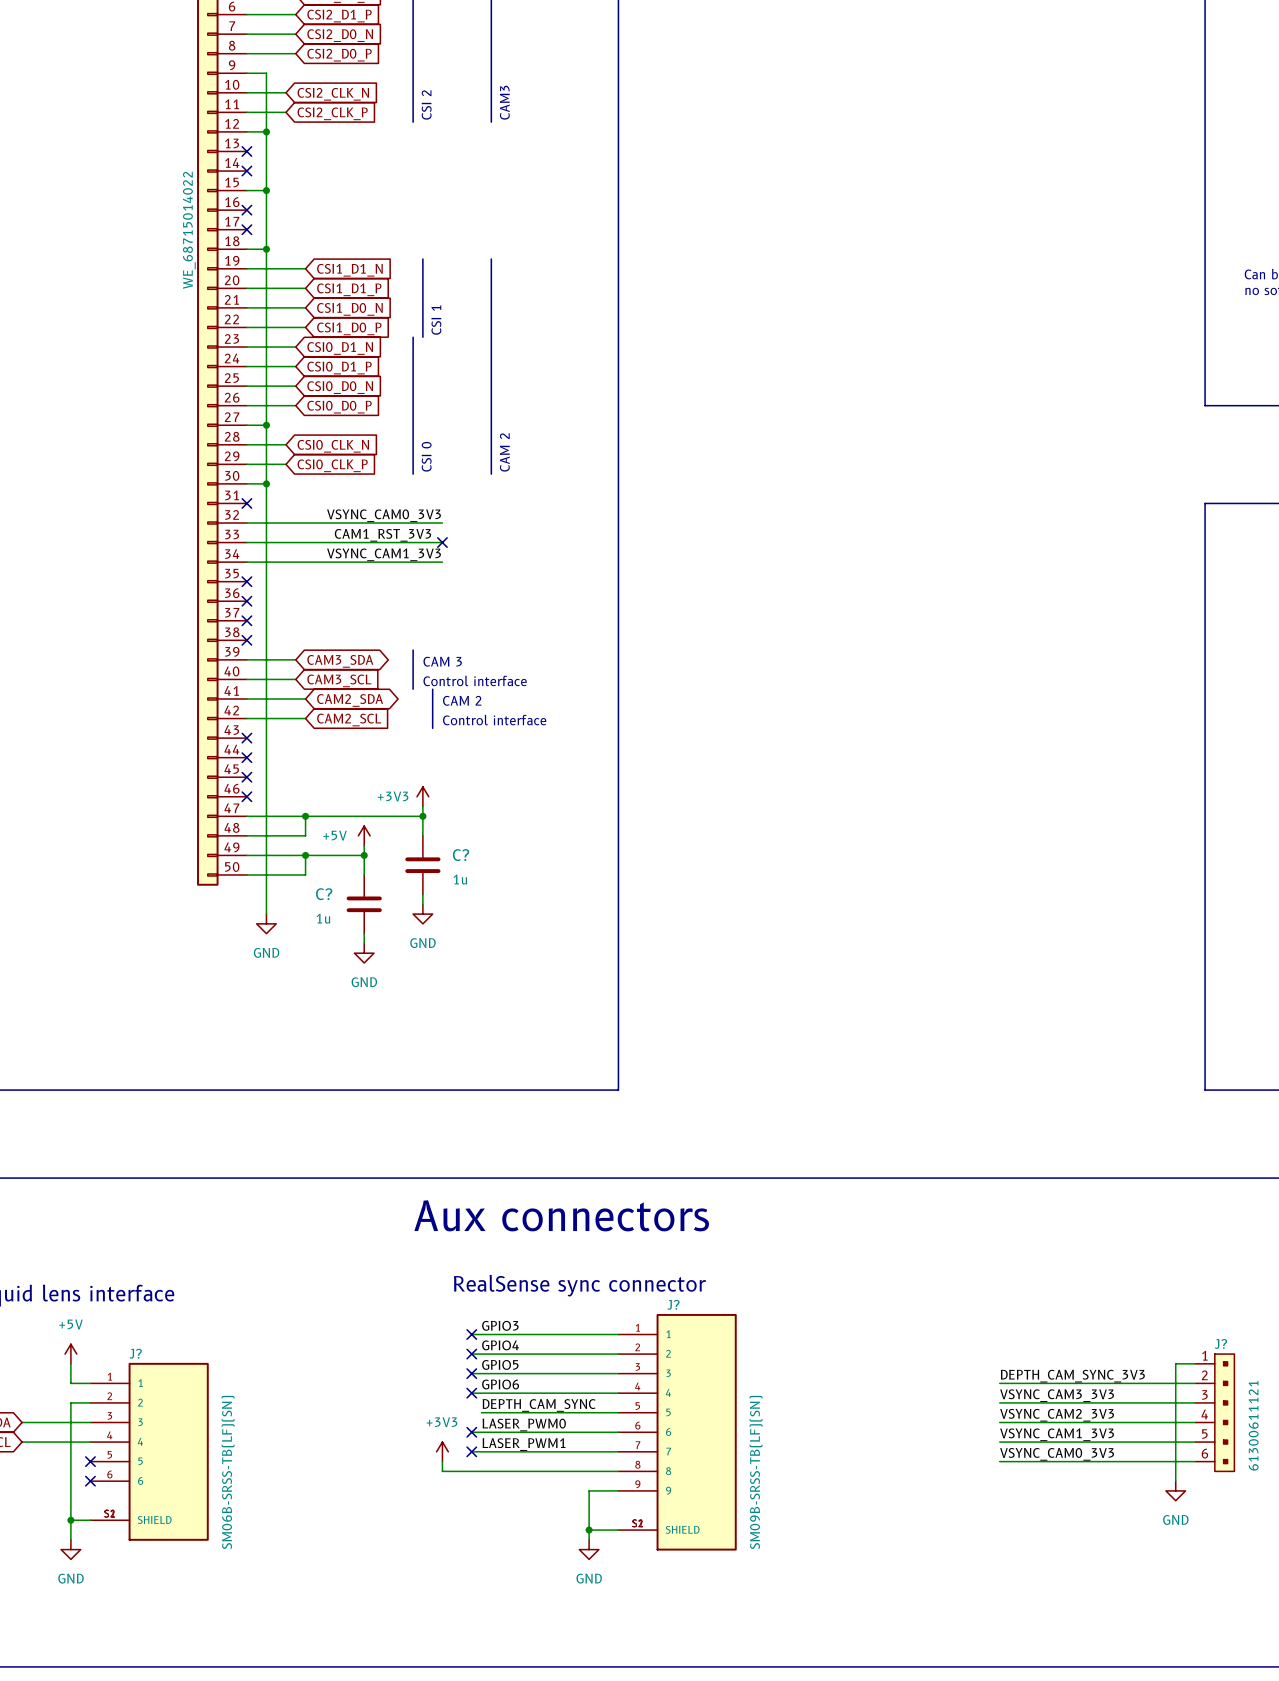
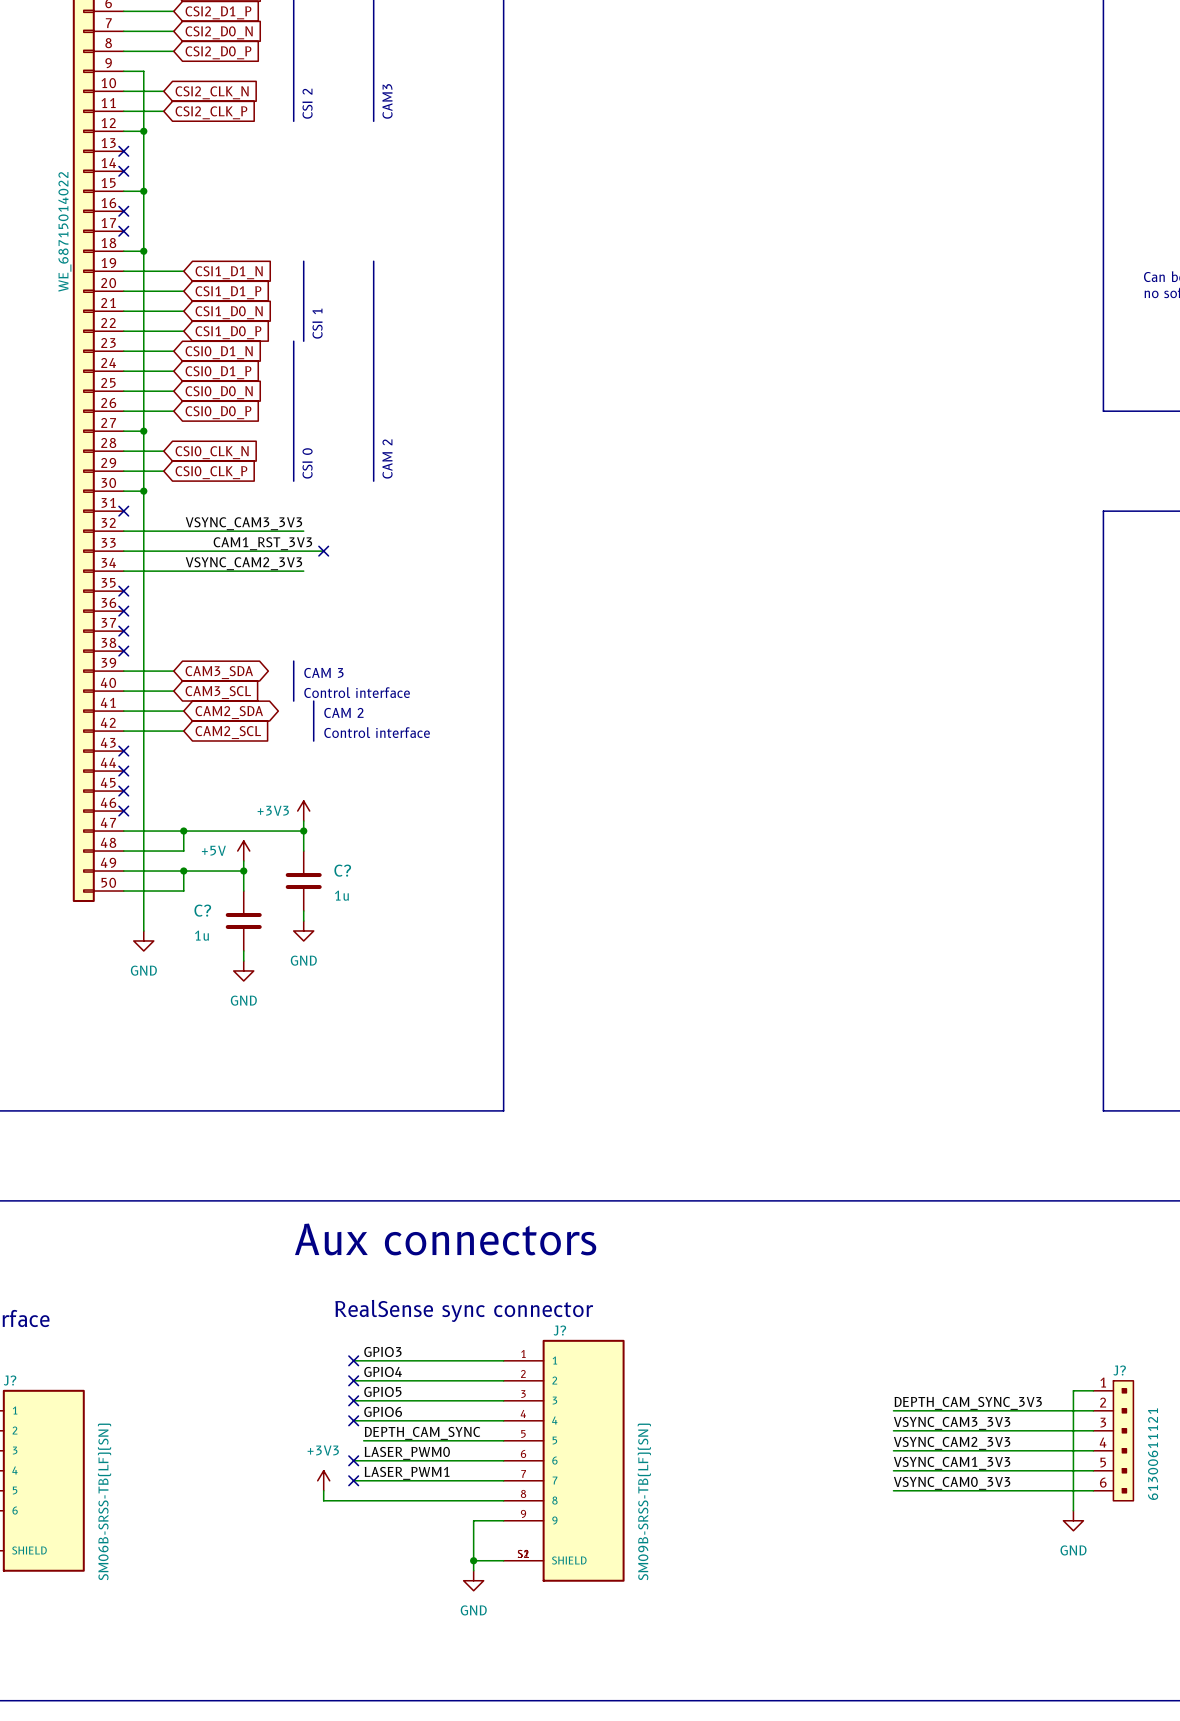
label: VSYNC_CAM0_3V3 (383, 515) -> VSYNC_CAM3_3V3 (243, 523)
wire: (422, 523) (442, 523) -> none
label: VSYNC_CAM1_3V3 (383, 554) -> VSYNC_CAM2_3V3 (243, 563)
wire: (422, 562) (442, 562) -> none

